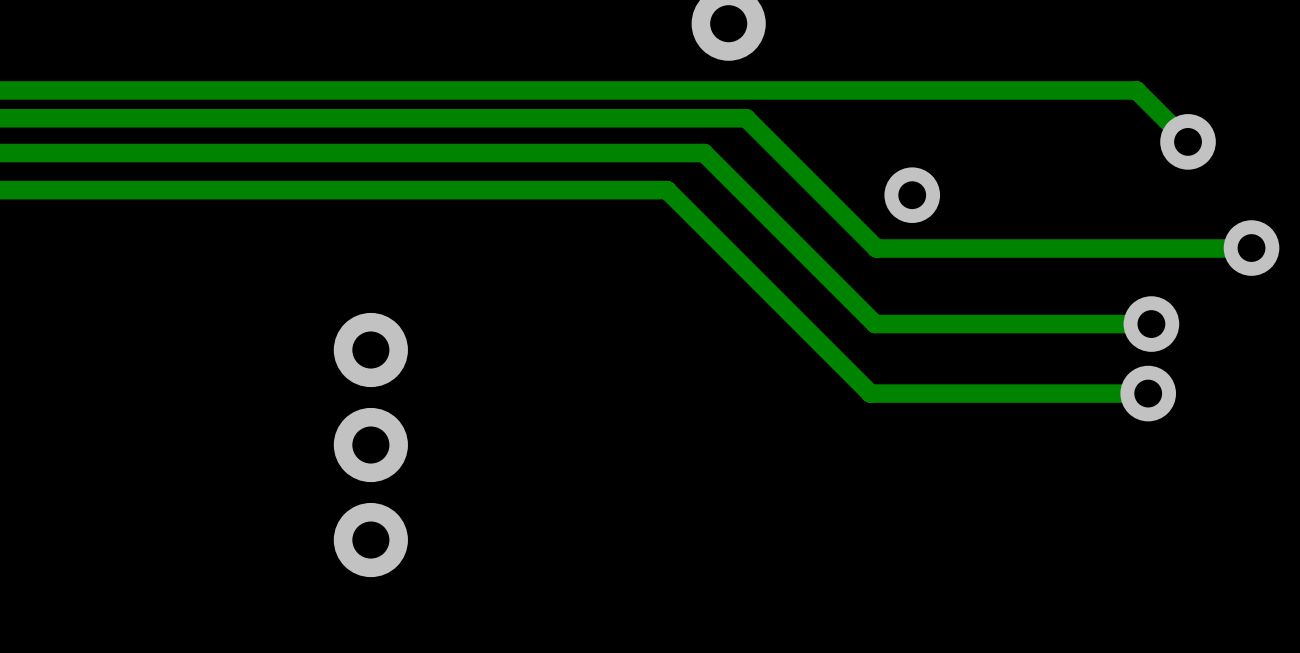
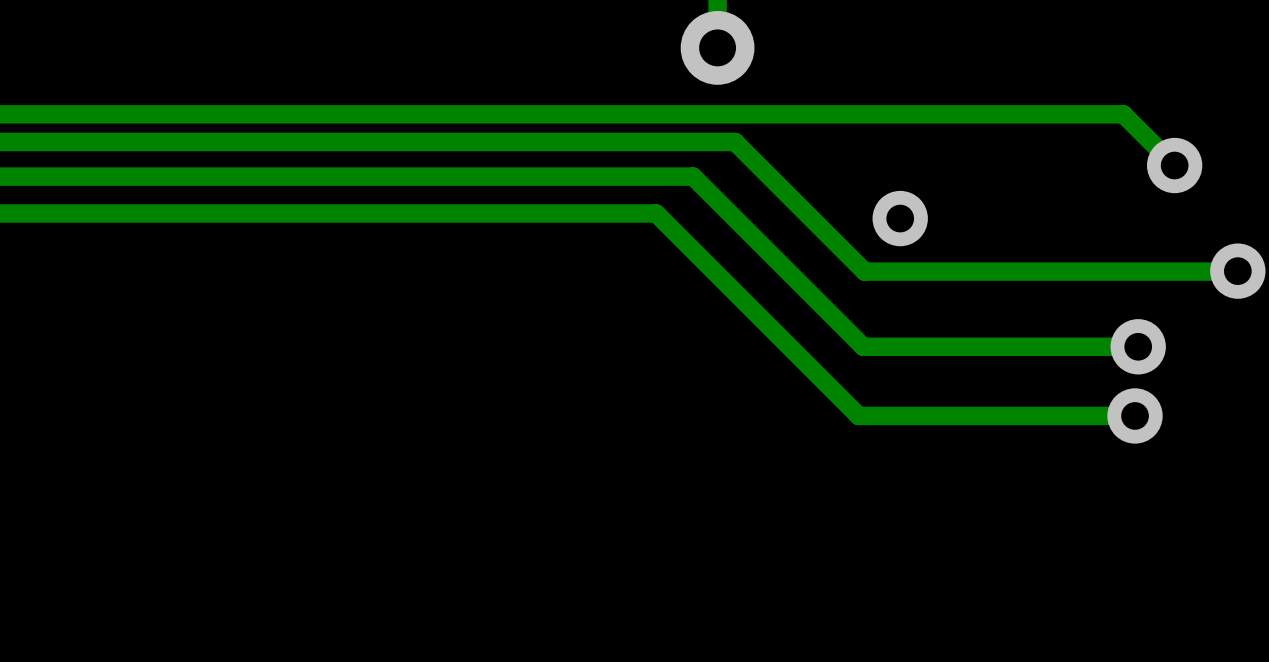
via: (370, 350) -> none
via: (370, 445) -> none
via: (370, 540) -> none

